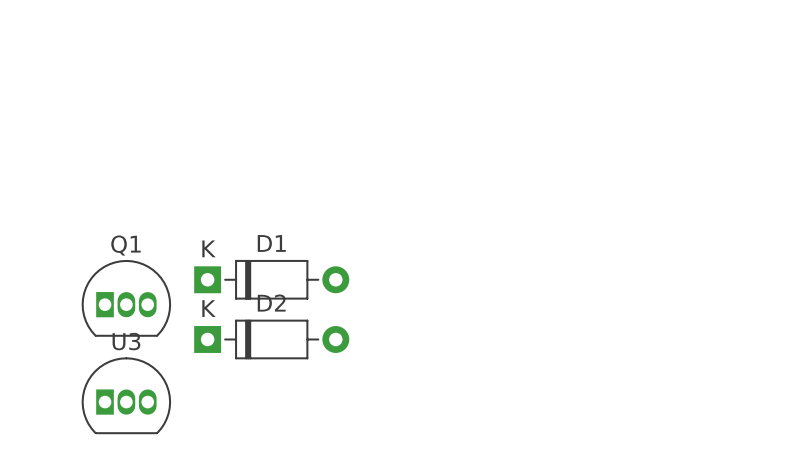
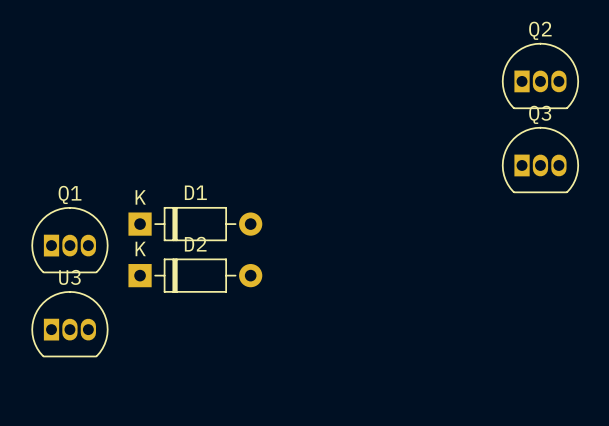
Q2: none -> (540, 75)
Q3: none -> (540, 160)

